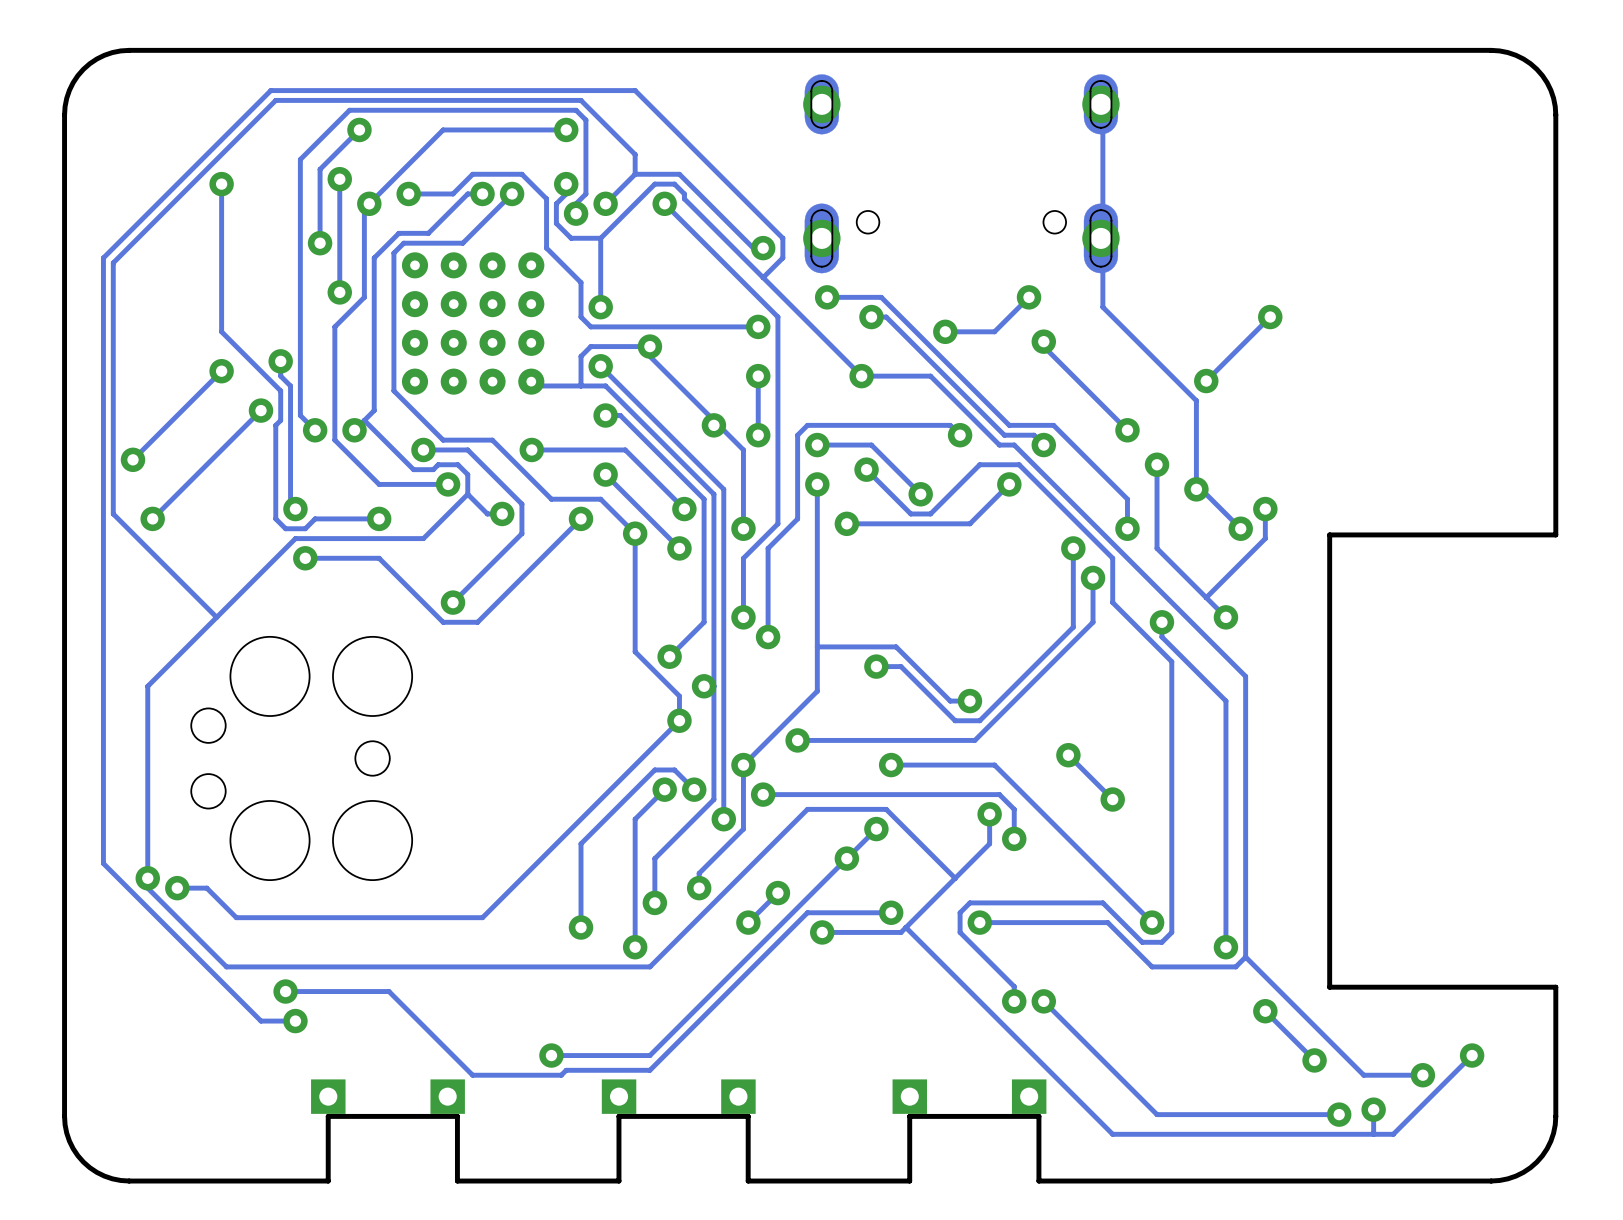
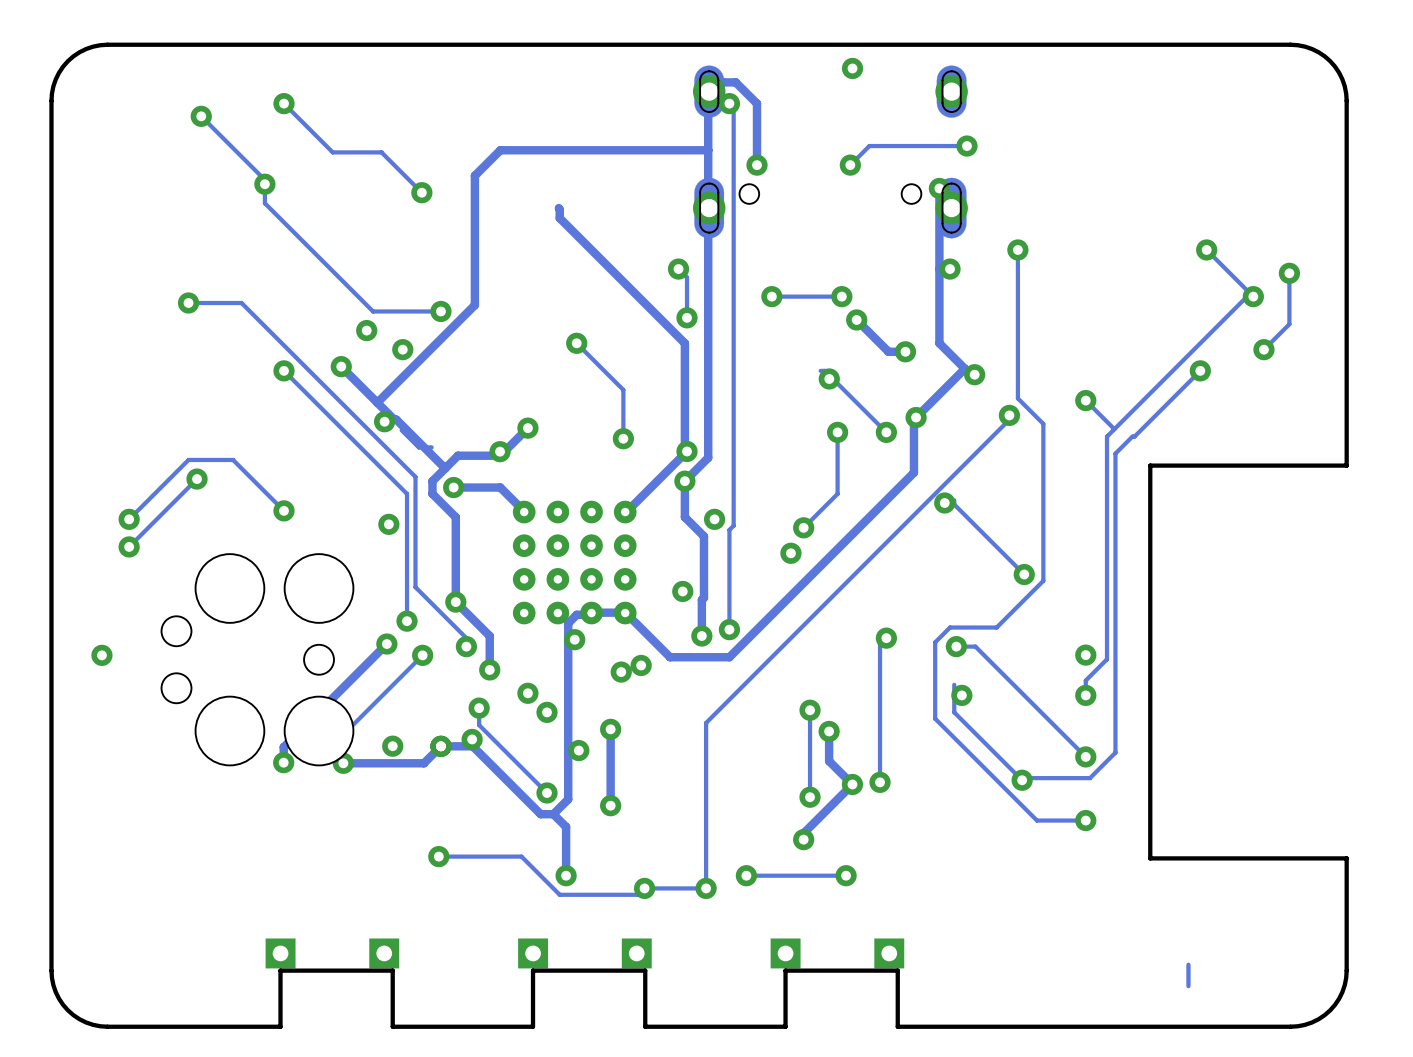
via: none -> (852, 68)
track: (1100, 104) (1102, 105) (1102, 238) (1100, 238) (1102, 243) (1102, 307) (1196, 400) (1196, 489) -> none
track: none -> (283, 103) (332, 152) (381, 152) (421, 192)
track: none -> (729, 103) (733, 107) (733, 525) (729, 529) (729, 629)
via: none -> (729, 103)
track: (359, 129) (320, 169) (320, 243) -> none
via position: (359, 129) -> (283, 103)
track: (566, 129) (443, 129) (364, 208) (364, 297) (334, 326) (334, 440) (379, 484) (448, 484) -> none
via: (566, 129) -> none
track: none -> (201, 116) (264, 179) (264, 203) (373, 311) (440, 311)
via: none -> (201, 116)
track: none -> (966, 146) (869, 146) (850, 165)
via: none -> (966, 146)
track: none -> (708, 150) (500, 150) (474, 175) (474, 305) (377, 402)
track: (635, 174) (679, 174) (753, 248) (763, 248) -> none
track: (635, 174) (605, 203) -> none
track: (635, 174) (635, 154) (581, 100) (275, 100) (113, 262) (113, 513) (216, 617) -> none
track: (339, 179) (339, 292) -> none
via: (339, 179) -> none
track: (221, 184) (221, 331) (280, 390) (280, 420) (275, 425) (275, 518) (285, 528) (305, 528) (315, 518) (379, 518) -> none
via: (221, 184) -> none
track: (566, 184) (566, 193) (556, 203) (556, 223) (571, 238) (600, 238) -> none
via: (566, 184) -> none
track: none -> (757, 165) (757, 103) (735, 82) (723, 82) (708, 97) (708, 457) (684, 481) (684, 517) (703, 536) (701, 636)
via: none -> (757, 165)
via: none -> (850, 165)
track: (408, 193) (453, 193) (472, 174) (521, 174) (546, 198) (546, 248) (581, 282) (581, 317) (590, 326) (758, 326) -> none
via: (408, 193) -> none
track: (482, 193) (467, 193) (428, 233) (398, 233) (374, 257) (374, 410) (354, 430) -> none
via: (482, 193) -> none
track: (512, 193) (462, 243) (403, 243) (393, 253) (393, 390) (443, 440) (492, 440) (551, 499) (600, 499) (635, 533) (635, 651) (679, 696) (679, 720) (482, 917) (236, 917) (206, 888) (177, 888) -> none
via: (512, 193) -> none
via: (369, 203) -> none
via: (605, 203) -> none
track: (664, 203) (777, 317) (777, 523) (743, 558) (743, 617) -> none
via: (664, 203) -> none
via: none -> (264, 184)
track: (576, 213) (576, 203) (585, 193) (585, 120) (576, 110) (349, 110) (300, 159) (300, 415) (315, 430) -> none
via: (576, 213) -> none
track: none -> (939, 188) (939, 343) (964, 368) (913, 419) (913, 472) (729, 657) (670, 657) (625, 613) (576, 614) (568, 623) (568, 799) (553, 814)
via: none -> (939, 188)
via: none -> (421, 192)
track: (600, 238) (654, 184) (674, 184) (684, 193) (684, 198) (861, 376) (930, 376) (999, 445) (1014, 445) (1245, 676) (1245, 957) -> none
track: (600, 238) (600, 307) -> none
track: none -> (558, 208) (559, 218) (684, 343) (684, 449) (687, 451) (625, 512)
via: (320, 243) -> none
via: (763, 248) -> none
track: (763, 277) (782, 257) (782, 238) (635, 90) (270, 90) (103, 257) (103, 863) (260, 1021) (295, 1021) -> none
track: none -> (1017, 249) (1017, 398) (1043, 423) (1043, 580) (996, 627) (950, 627) (935, 642) (935, 718) (1036, 820) (1085, 820)
via: none -> (1017, 249)
track: none -> (1206, 249) (1253, 296) (1249, 294) (1106, 436) (1106, 659) (1085, 680) (1085, 695)
via: none -> (1206, 249)
via: (339, 292) -> none
track: (827, 297) (881, 297) (1009, 425) (1053, 425) (1127, 499) (1127, 528) -> none
via: (827, 297) -> none
track: (1029, 297) (994, 331) (945, 331) -> none
via: (1029, 297) -> none
via: (600, 307) -> none
track: none -> (678, 269) (687, 277) (687, 317)
via: none -> (678, 269)
via: none -> (950, 269)
track: none -> (1289, 273) (1289, 324) (1263, 349)
via: none -> (1289, 273)
track: (871, 317) (886, 317) (1004, 435) (1033, 435) (1043, 445) -> none
via: (871, 317) -> none
track: (1270, 317) (1206, 381) -> none
via: (1270, 317) -> none
part position: (473, 323) -> (574, 562)
via: (758, 326) -> none
via: (945, 331) -> none
via: none -> (771, 296)
track: none -> (841, 296) (771, 296)
via: none -> (841, 296)
via: none -> (1253, 296)
track: (1043, 341) (1043, 346) (1127, 430) -> none
via: (1043, 341) -> none
track: (640, 346) (743, 449) (743, 528) -> none
track: (649, 346) (590, 346) (581, 356) (581, 385) -> none
via: (649, 346) -> none
track: none -> (188, 302) (241, 302) (415, 476) (415, 587) (466, 638) (466, 646)
via: none -> (440, 311)
track: (280, 361) (280, 376) (290, 385) (290, 504) (295, 509) -> none
via: (280, 361) -> none
via: none -> (687, 317)
track: (600, 366) (723, 489) (723, 819) -> none
via: (600, 366) -> none
track: none -> (856, 319) (888, 351) (905, 351)
via: none -> (856, 319)
track: (221, 371) (132, 459) -> none
via position: (221, 371) -> (188, 302)
track: (758, 376) (758, 435) -> none
via: (758, 376) -> none
via: (861, 376) -> none
via: none -> (366, 330)
track: (531, 381) (531, 385) (605, 385) (713, 494) (713, 799) (654, 858) (654, 902) -> none
via: (1206, 381) -> none
track: none -> (576, 343) (623, 389) (623, 438)
via: none -> (576, 343)
via: none -> (402, 349)
via: none -> (1263, 349)
via: none -> (905, 351)
track: (260, 410) (152, 518) -> none
via: (260, 410) -> none
track: (605, 415) (620, 415) (704, 499) (704, 622) (669, 656) -> none
via: (605, 415) -> none
track: (364, 420) (413, 469) (433, 469) (438, 464) (457, 464) (467, 474) (467, 494) (423, 538) (295, 538) (147, 686) (147, 888) (226, 966) (649, 966) (807, 809) (886, 809) (955, 878) -> none
track: none -> (341, 366) (445, 468)
via: none -> (341, 366)
track: none -> (283, 370) (407, 493) (407, 621)
via: none -> (283, 370)
via: (713, 425) -> none
track: none -> (820, 370) (824, 370) (886, 432)
track: none -> (1200, 370) (1115, 453) (1115, 752) (1090, 778) (1022, 778) (1022, 780) (954, 712) (954, 684)
via: none -> (1200, 370)
via: (315, 430) -> none
via: (354, 430) -> none
via: (758, 435) -> none
track: (960, 435) (950, 425) (807, 425) (797, 435) (797, 518) (768, 548) (768, 637) -> none
track: (817, 445) (871, 445) (920, 494) -> none
via: (817, 445) -> none
via: (1043, 445) -> none
track: (423, 449) (467, 449) (521, 504) (521, 533) (453, 602) -> none
via: (423, 449) -> none
track: (531, 449) (625, 449) (684, 509) -> none
via: (531, 449) -> none
via: (132, 459) -> none
track: none -> (1085, 400) (1114, 429)
via: none -> (1085, 400)
track: (1157, 464) (1157, 548) (1225, 617) -> none
via position: (1157, 464) -> (1009, 415)
track: (866, 469) (910, 513) (930, 513) (979, 464) (1019, 464) (1112, 558) (1112, 602) (1171, 661) (1171, 932) (1161, 942) (1142, 942) (1102, 902) (969, 902) (960, 912) (960, 932) (1014, 986) (1014, 1001) -> none
via: (866, 469) -> none
track: (605, 474) (679, 548) -> none
via position: (605, 474) -> (527, 428)
track: none -> (1009, 415) (1009, 419) (706, 722) (706, 888) (644, 888) (638, 894) (559, 894) (521, 856) (438, 856)
via: none -> (916, 417)
track: (817, 484) (817, 691) (743, 765) (743, 829) (699, 873) (699, 888) -> none
via: (817, 484) -> none
track: (1009, 484) (969, 523) (846, 523) -> none
via position: (1009, 484) -> (886, 432)
track: (1196, 484) (1240, 528) -> none
via: (1196, 489) -> none
track: none -> (527, 428) (500, 455) (457, 455) (432, 481) (432, 493) (455, 517) (455, 602) (489, 636) (489, 669)
via: (920, 494) -> none
track: none -> (837, 432) (837, 493) (803, 527)
via: none -> (837, 432)
via: none -> (623, 438)
via: (295, 509) -> none
via: (684, 509) -> none
track: (1265, 509) (1265, 538) (1206, 597) -> none
via: (1265, 509) -> none
via position: (502, 513) -> (453, 487)
via: (152, 518) -> none
via: (379, 518) -> none
track: (581, 518) (477, 622) (443, 622) (379, 558) (305, 558) -> none
via: none -> (687, 451)
via: (846, 523) -> none
via: (743, 528) -> none
via: (1127, 528) -> none
via: (1240, 528) -> none
via: (635, 533) -> none
via: (679, 548) -> none
track: (1073, 548) (1073, 627) (979, 720) (955, 720) (901, 666) (876, 666) -> none
via: (1073, 548) -> none
track: none -> (197, 479) (129, 546)
via: none -> (197, 479)
via: none -> (684, 481)
via: (305, 558) -> none
track: none -> (453, 487) (500, 487) (524, 512)
track: none -> (954, 500) (954, 504) (1024, 574)
track: (1093, 577) (1093, 622) (974, 740) (797, 740) -> none
track: none -> (283, 510) (233, 459) (188, 459) (129, 519)
via: none -> (283, 510)
via: none -> (129, 519)
via: none -> (714, 519)
via: none -> (803, 527)
via: (743, 617) -> none
via: (1225, 617) -> none
track: (1161, 622) (1161, 637) (1225, 701) (1225, 947) -> none
via: (1161, 622) -> none
via: none -> (129, 546)
via: none -> (790, 553)
via: (768, 637) -> none
track: (817, 646) (896, 646) (950, 701) (969, 701) -> none
via: (669, 656) -> none
via: none -> (1024, 574)
via: (876, 666) -> none
via: none -> (682, 591)
via: (704, 686) -> none
via: none -> (455, 602)
via: (969, 701) -> none
via: none -> (407, 621)
via position: (679, 720) -> (574, 639)
via: none -> (729, 629)
track: none -> (886, 638) (880, 644) (880, 782)
via: none -> (886, 638)
track: none -> (386, 644) (283, 747) (283, 762)
via: none -> (386, 644)
via position: (797, 740) -> (701, 636)
via: none -> (466, 646)
track: none -> (956, 646) (975, 646) (1085, 756)
via: none -> (956, 646)
via: none -> (101, 655)
track: none -> (422, 655) (331, 746) (308, 746)
via: none -> (422, 655)
via: none -> (1085, 655)
track: (1068, 755) (1112, 799) -> none
via: (1068, 755) -> none
track: (891, 765) (994, 765) (1152, 922) -> none
via: (891, 765) -> none
via: none -> (489, 669)
via: none -> (621, 672)
track: (664, 789) (635, 819) (635, 947) -> none
via: (664, 789) -> none
track: (694, 789) (674, 769) (654, 769) (581, 843) (581, 927) -> none
via: (694, 789) -> none
track: (763, 794) (999, 794) (1014, 809) (1014, 838) -> none
via: (763, 794) -> none
via: none -> (527, 693)
via: none -> (1085, 695)
track: none -> (479, 708) (479, 725) (547, 792)
via: none -> (479, 708)
track: (989, 814) (989, 843) (901, 932) (822, 932) -> none
via: (989, 814) -> none
track: none -> (810, 710) (810, 797)
via: none -> (810, 710)
via: none -> (547, 712)
via position: (723, 819) -> (610, 729)
track: (876, 829) (649, 1055) (551, 1055) -> none
via: (876, 829) -> none
track: none -> (610, 729) (610, 805)
via: (1014, 838) -> none
track: none -> (829, 731) (829, 761) (852, 784) (803, 833) (803, 839)
via: none -> (829, 731)
via: none -> (472, 739)
via: none -> (392, 746)
via: none -> (440, 746)
via: (846, 858) -> none
via: none -> (578, 750)
via: none -> (1085, 756)
via: none -> (283, 762)
track: none -> (343, 763) (423, 763) (440, 746) (472, 746) (540, 814) (553, 814)
via: none -> (343, 763)
via: (147, 878) -> none
via: (177, 888) -> none
via: (699, 888) -> none
track: (777, 893) (748, 922) -> none
via: (777, 893) -> none
via: none -> (1022, 780)
via: none -> (880, 782)
via position: (654, 902) -> (547, 792)
track: (891, 912) (807, 912) (649, 1070) (566, 1070) (561, 1075) (472, 1075) (389, 991) (285, 991) -> none
via: (891, 912) -> none
via: none -> (810, 797)
via: (748, 922) -> none
track: (979, 922) (1107, 922) (1152, 966) (1235, 966) (1245, 957) -> none
via position: (979, 922) -> (852, 784)
via: (1152, 922) -> none
via: none -> (610, 805)
via: (581, 927) -> none
track: (905, 927) (1112, 1134) (1393, 1134) (1472, 1055) -> none
via: (822, 932) -> none
track: none -> (553, 814) (566, 826) (566, 875)
via: (635, 947) -> none
via position: (1225, 947) -> (1085, 820)
track: (1245, 957) (1363, 1075) (1422, 1075) -> none
via: none -> (803, 839)
via: none -> (438, 856)
via: (285, 991) -> none
via: (1014, 1001) -> none
track: (1043, 1001) (1157, 1114) (1339, 1114) -> none
via: (1043, 1001) -> none
via: none -> (566, 875)
via: none -> (746, 875)
track: none -> (846, 875) (746, 875)
via: none -> (846, 875)
track: (1265, 1011) (1314, 1060) -> none
via: (1265, 1011) -> none
via: (295, 1021) -> none
via: none -> (644, 888)
via: none -> (706, 888)
via: (551, 1055) -> none
via: (1472, 1055) -> none
via: (1314, 1060) -> none
via: (1422, 1075) -> none
via: (1373, 1109) -> none
via: (1339, 1114) -> none

